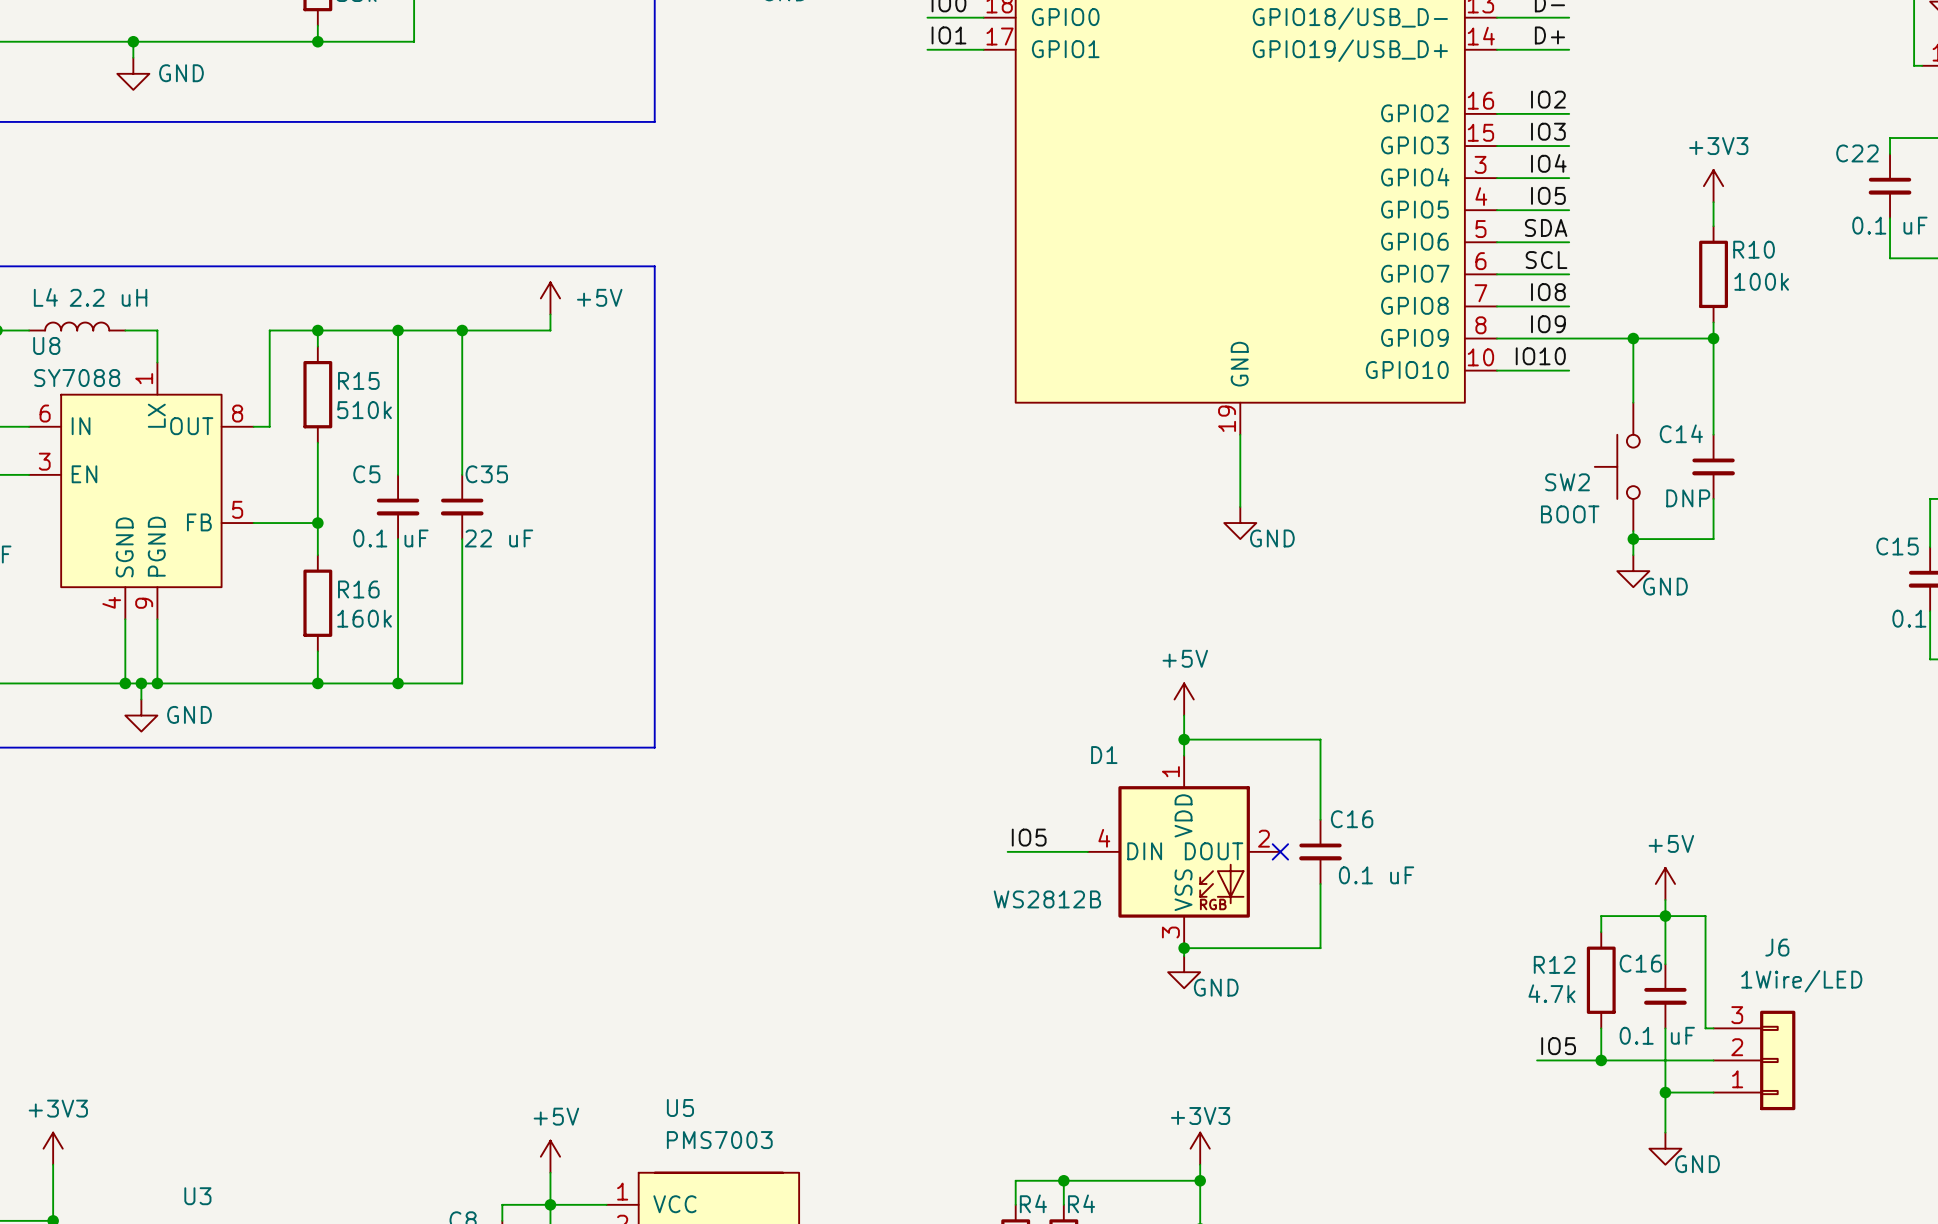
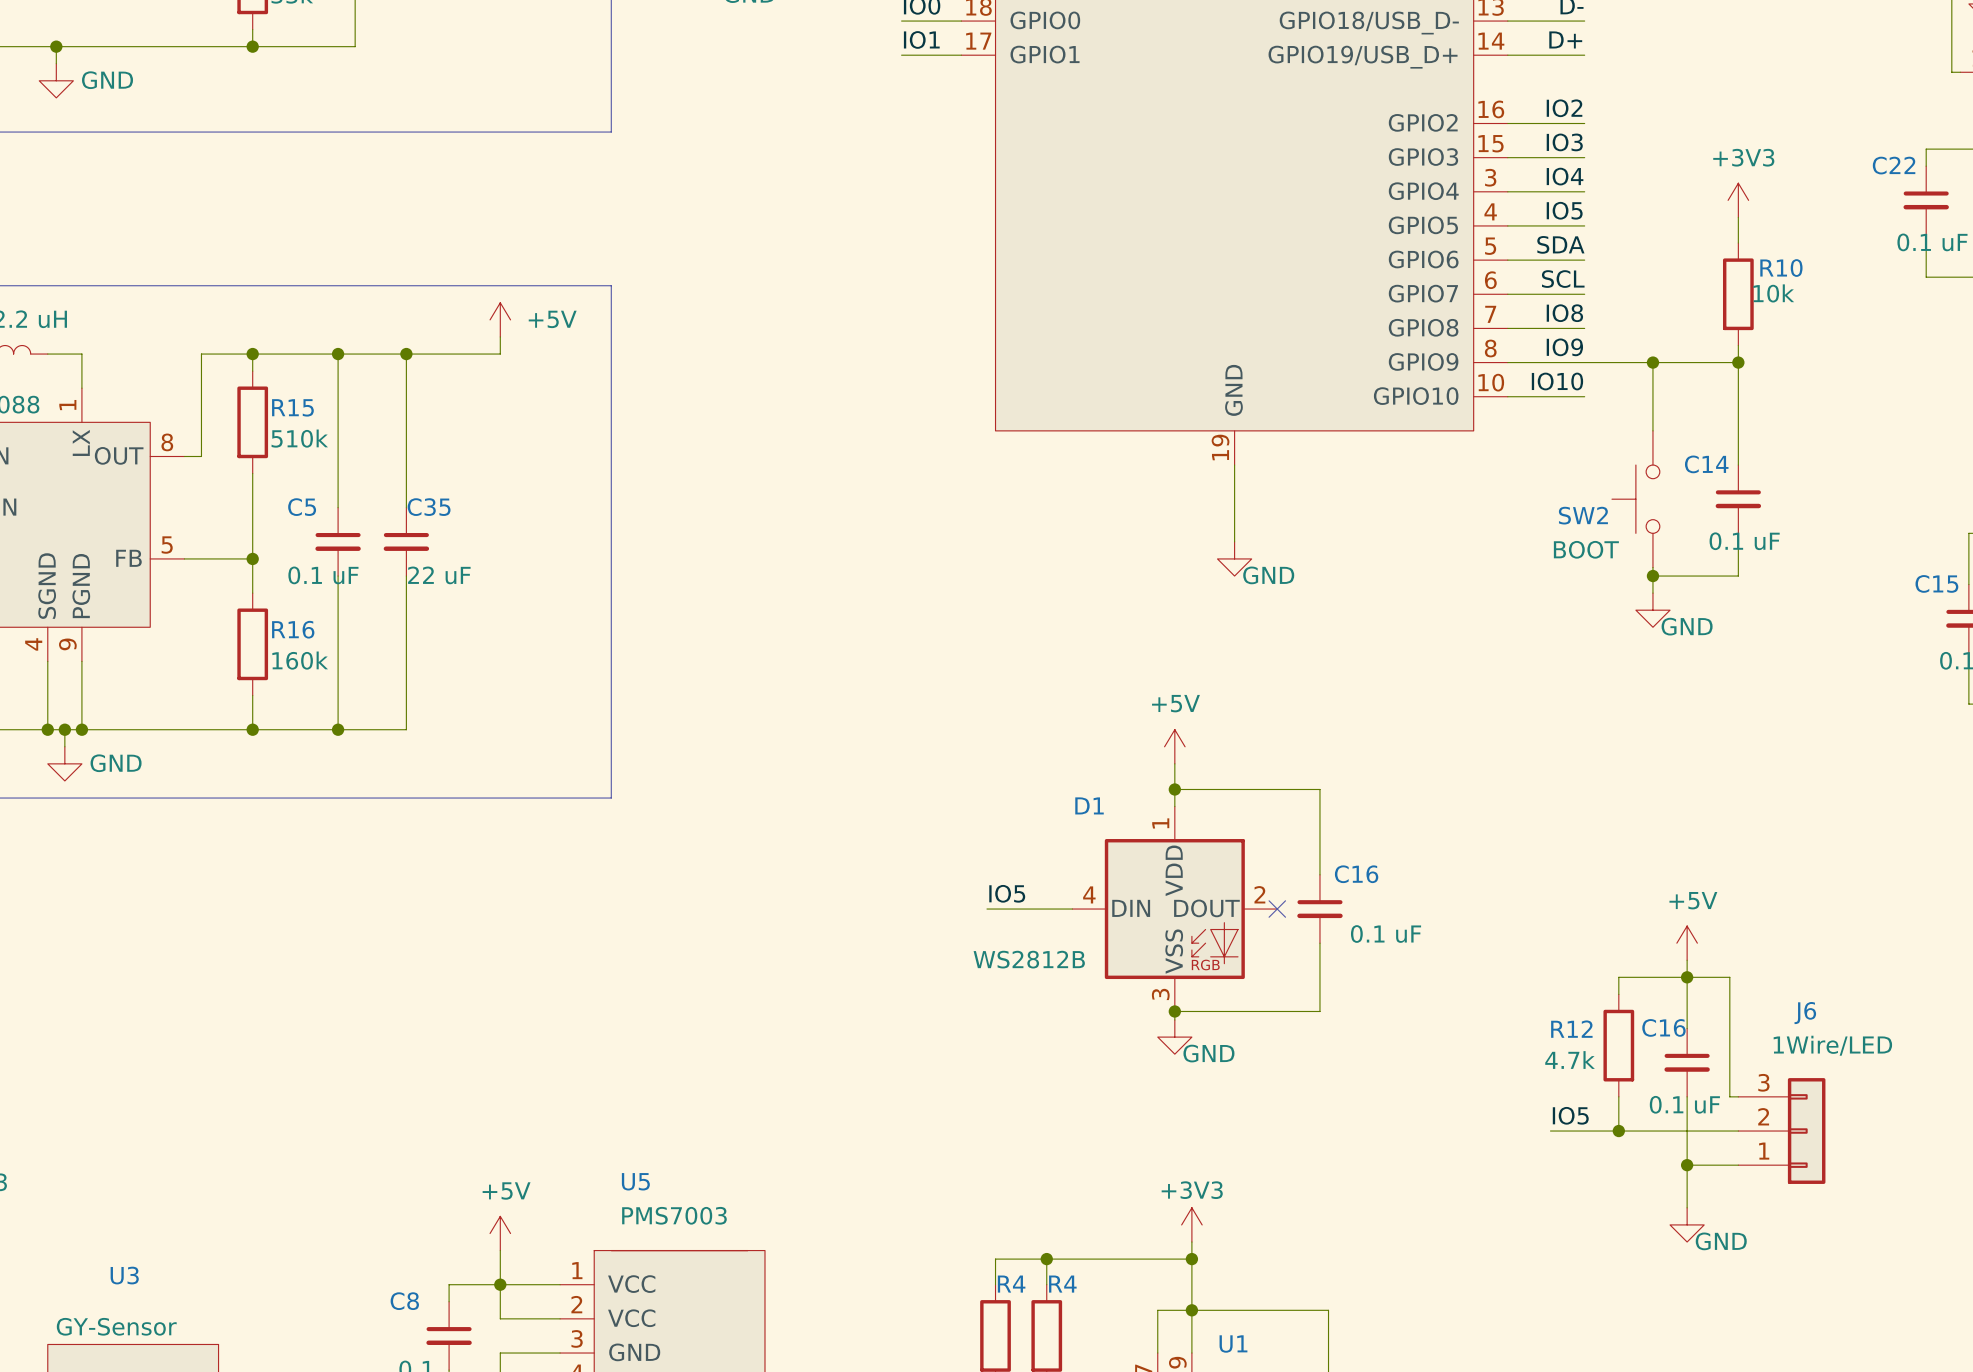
R10 value: 100k (1761, 281) -> 10k (1773, 293)
C14 value: DNP (1688, 498) -> 0.1 uF (1744, 541)

